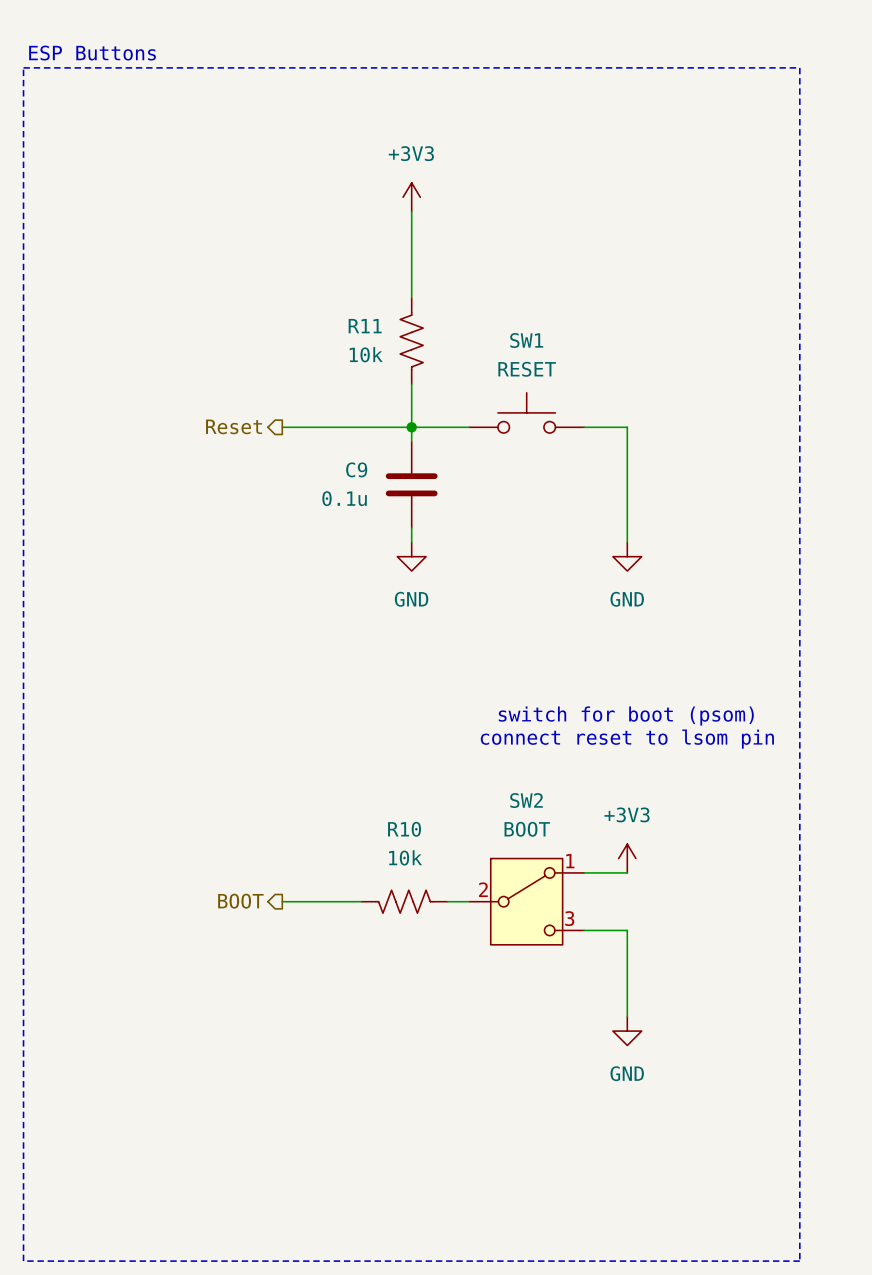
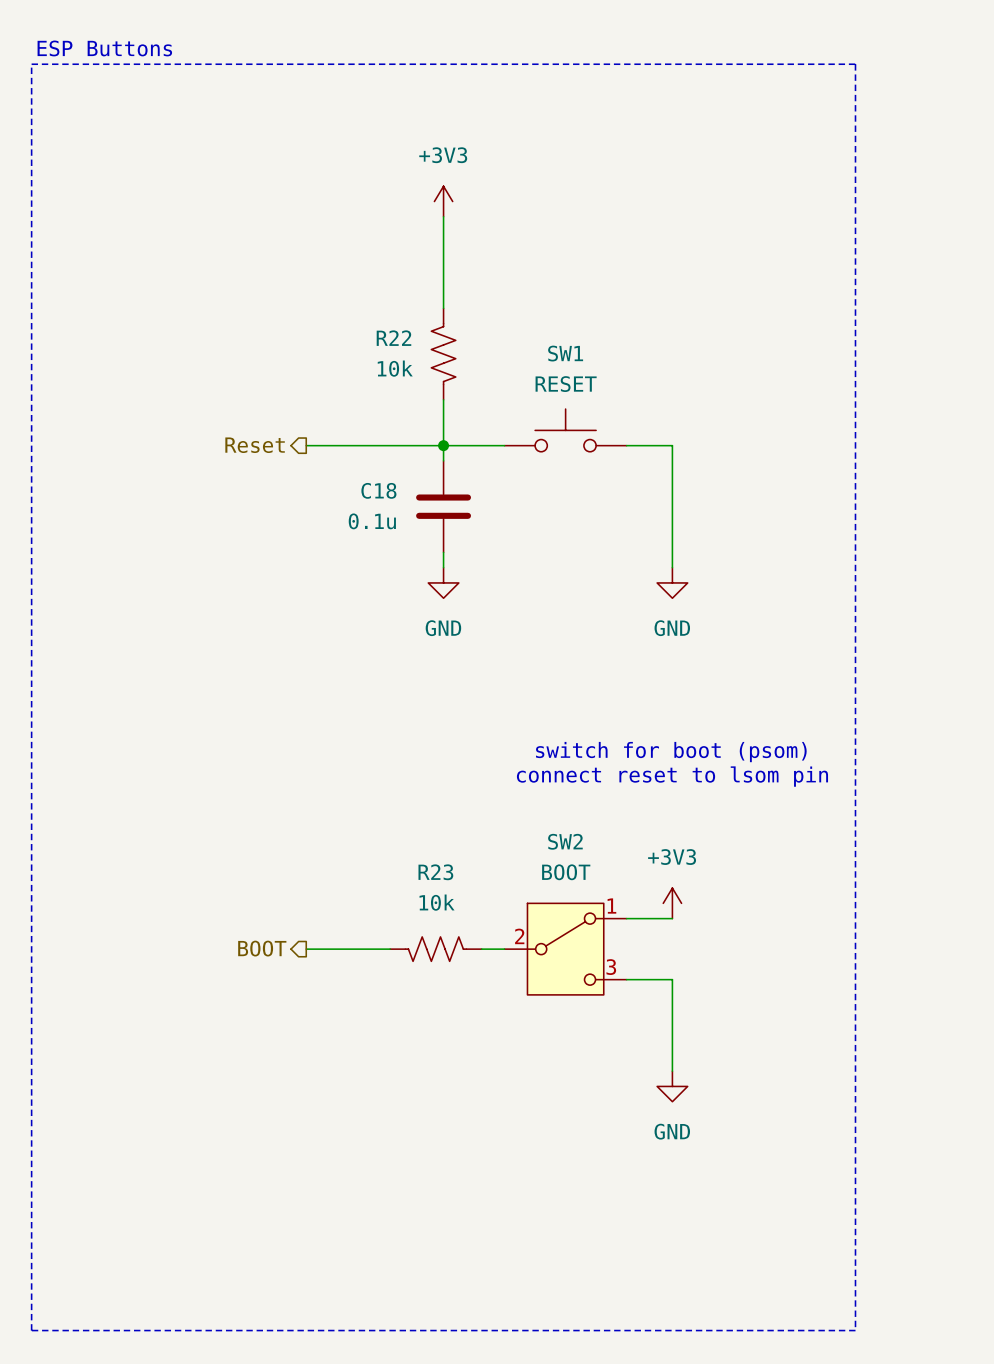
R11 name: R11 (365, 326) -> R22 (393, 338)
C9 name: C9 (356, 469) -> C18 (378, 490)
R10 name: R10 (404, 829) -> R23 (435, 872)

